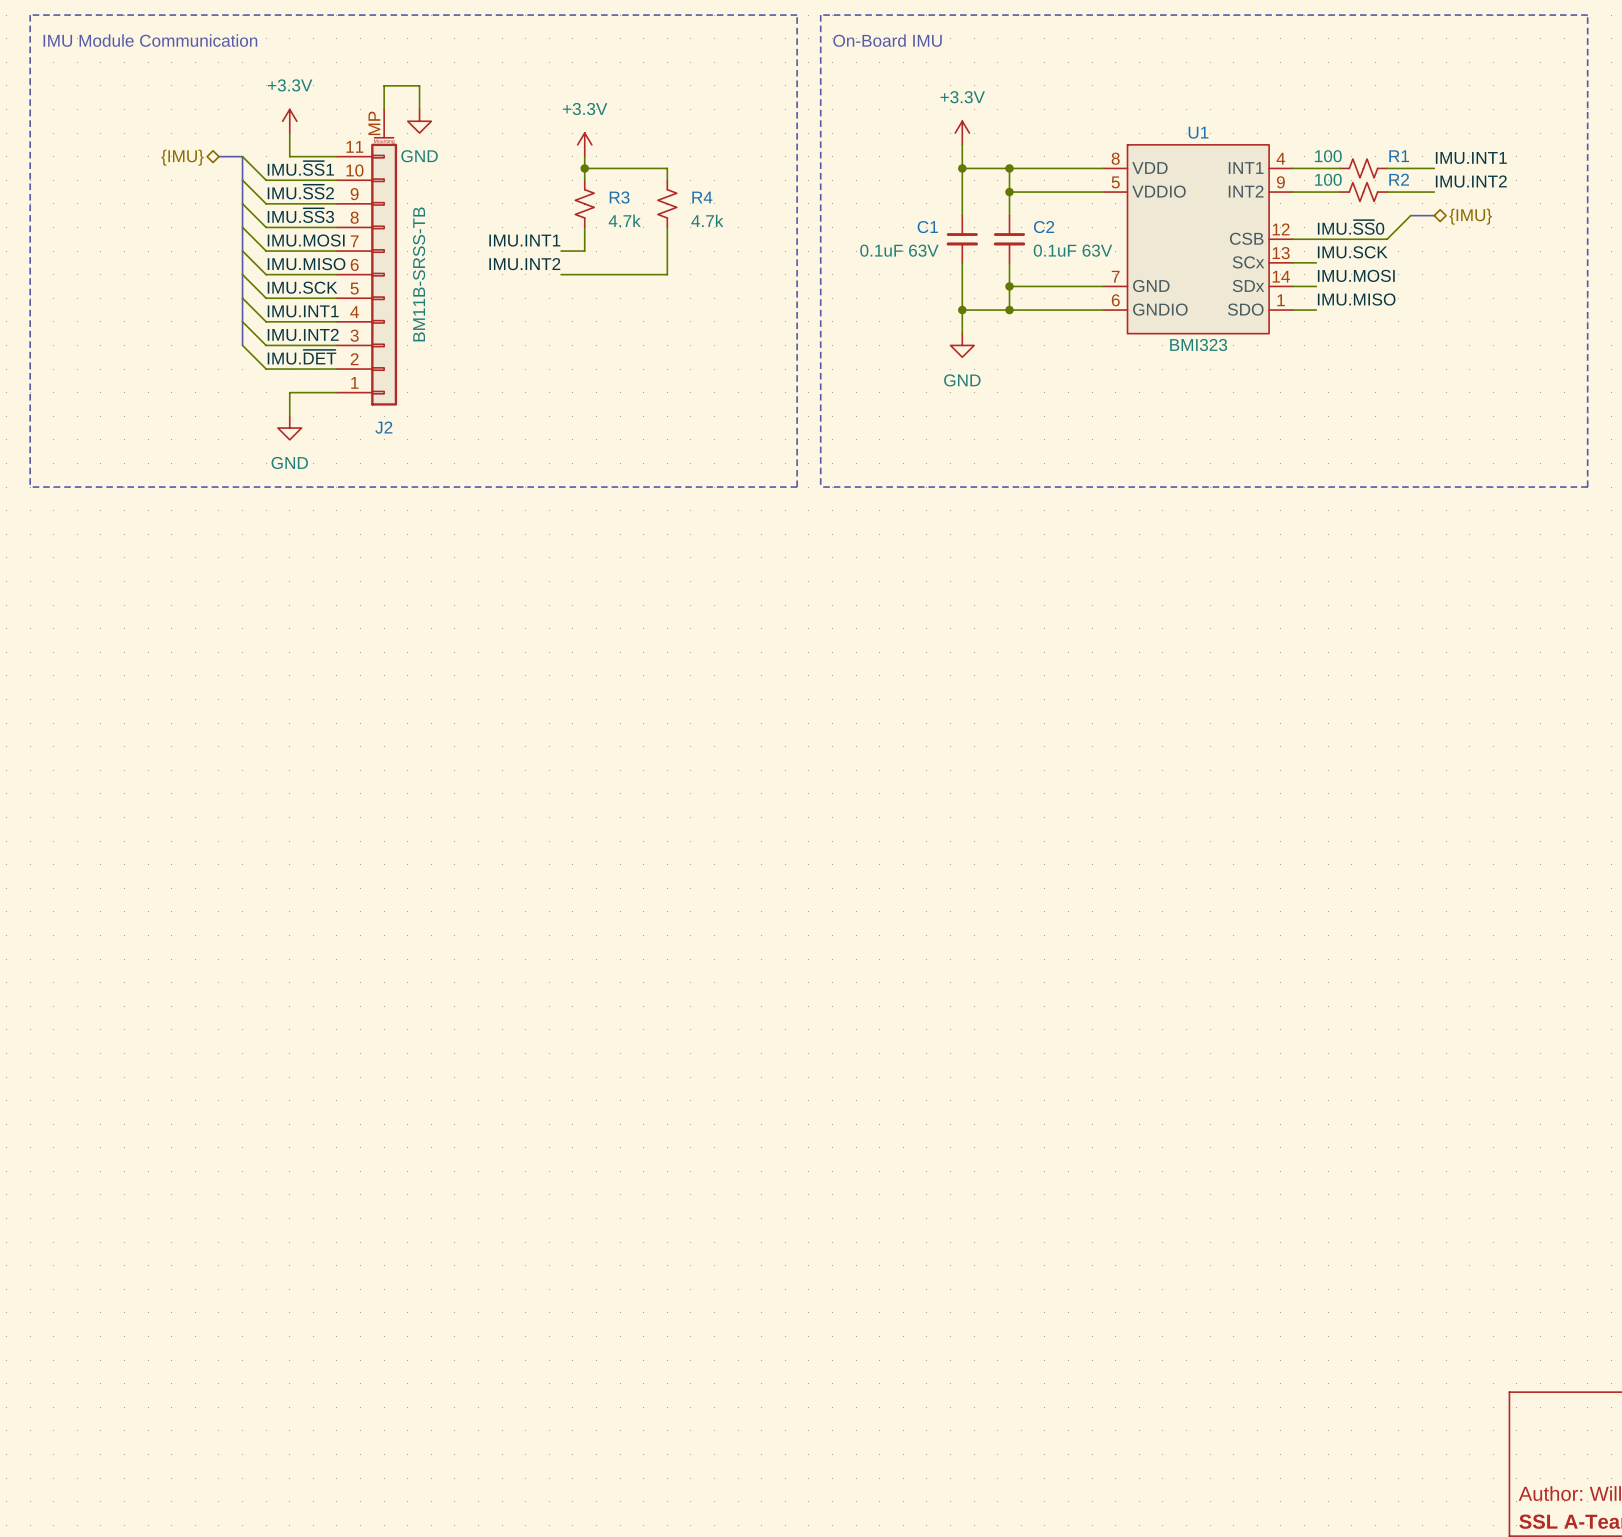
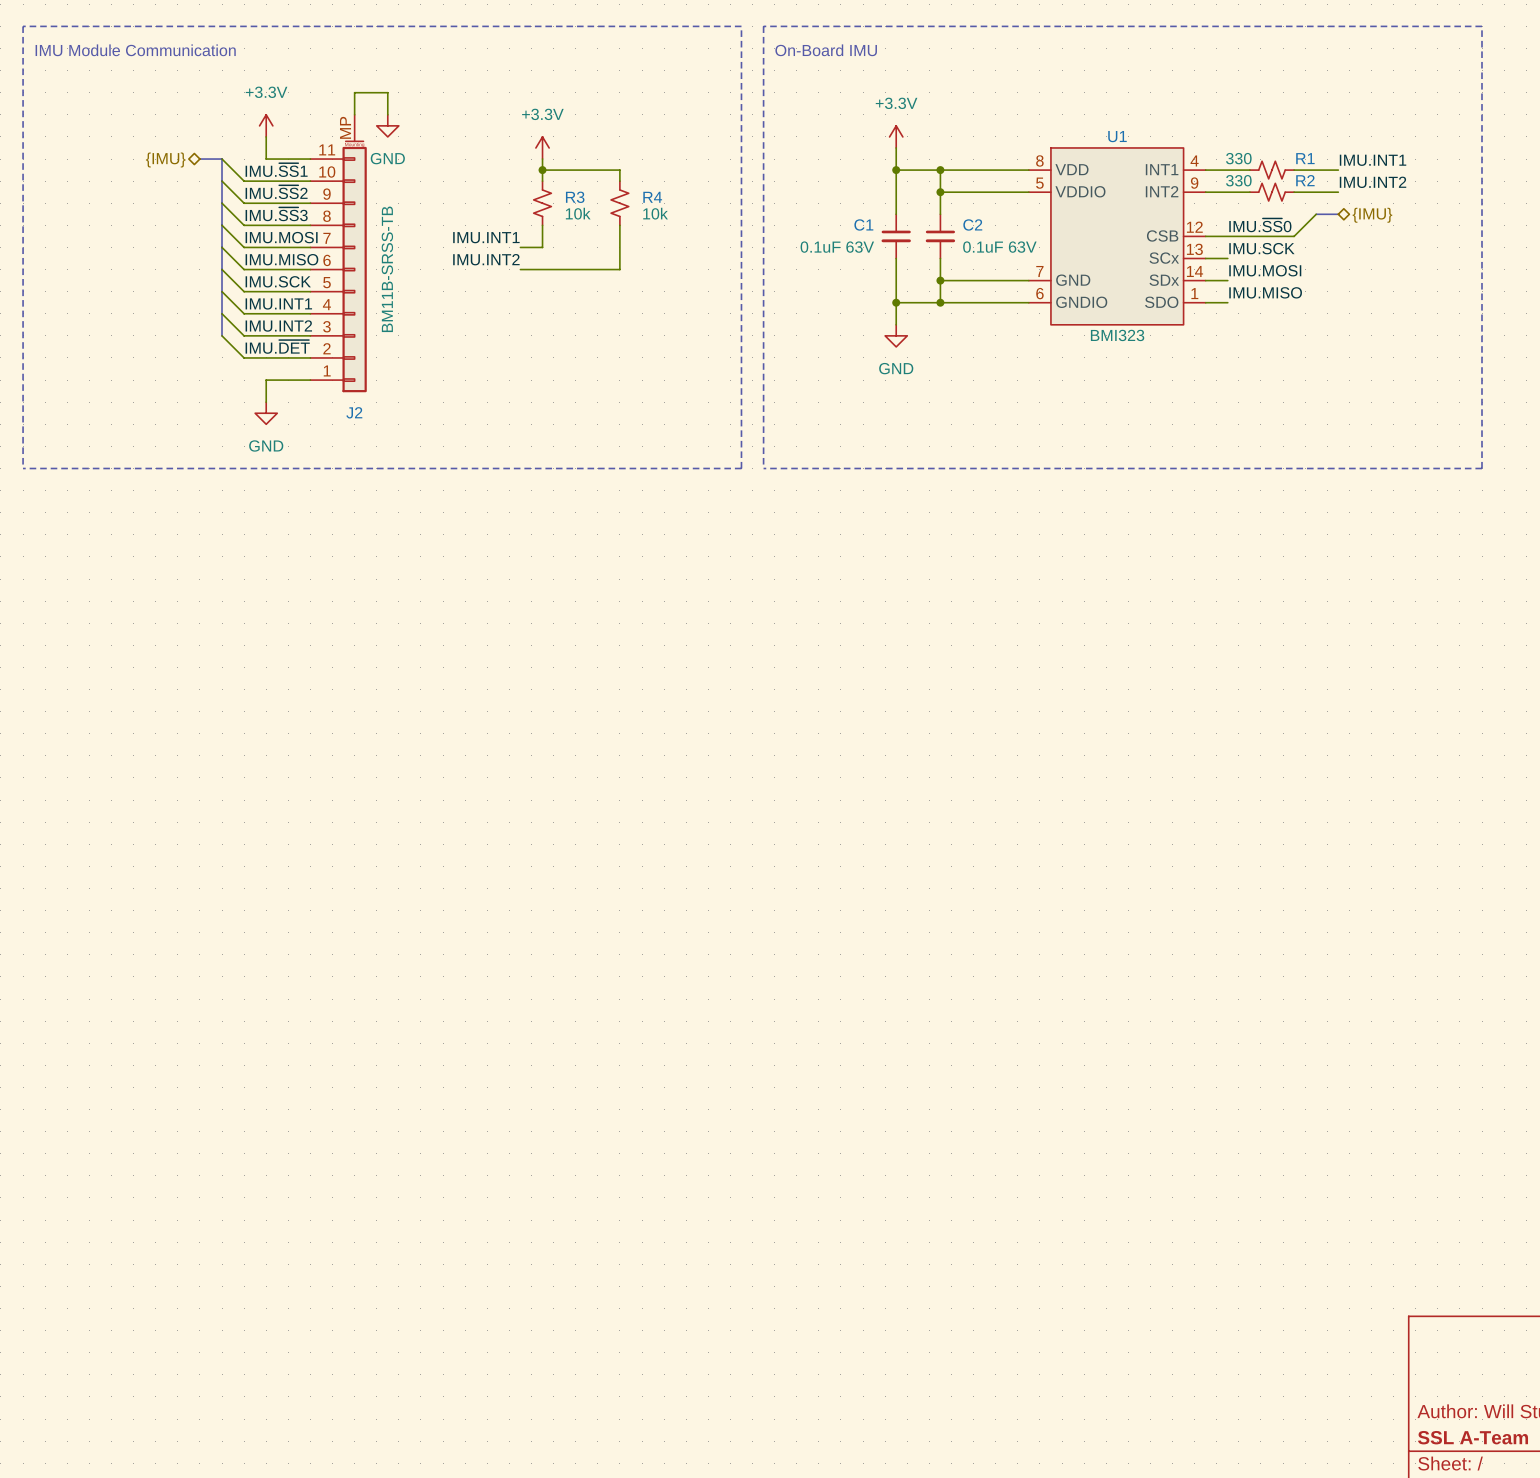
R1 value: 100 (1328, 156) -> 330 (1238, 158)
R2 value: 100 (1328, 179) -> 330 (1238, 180)
R3 value: 4.7k (624, 220) -> 10k (578, 213)
R4 value: 4.7k (707, 220) -> 10k (655, 213)

